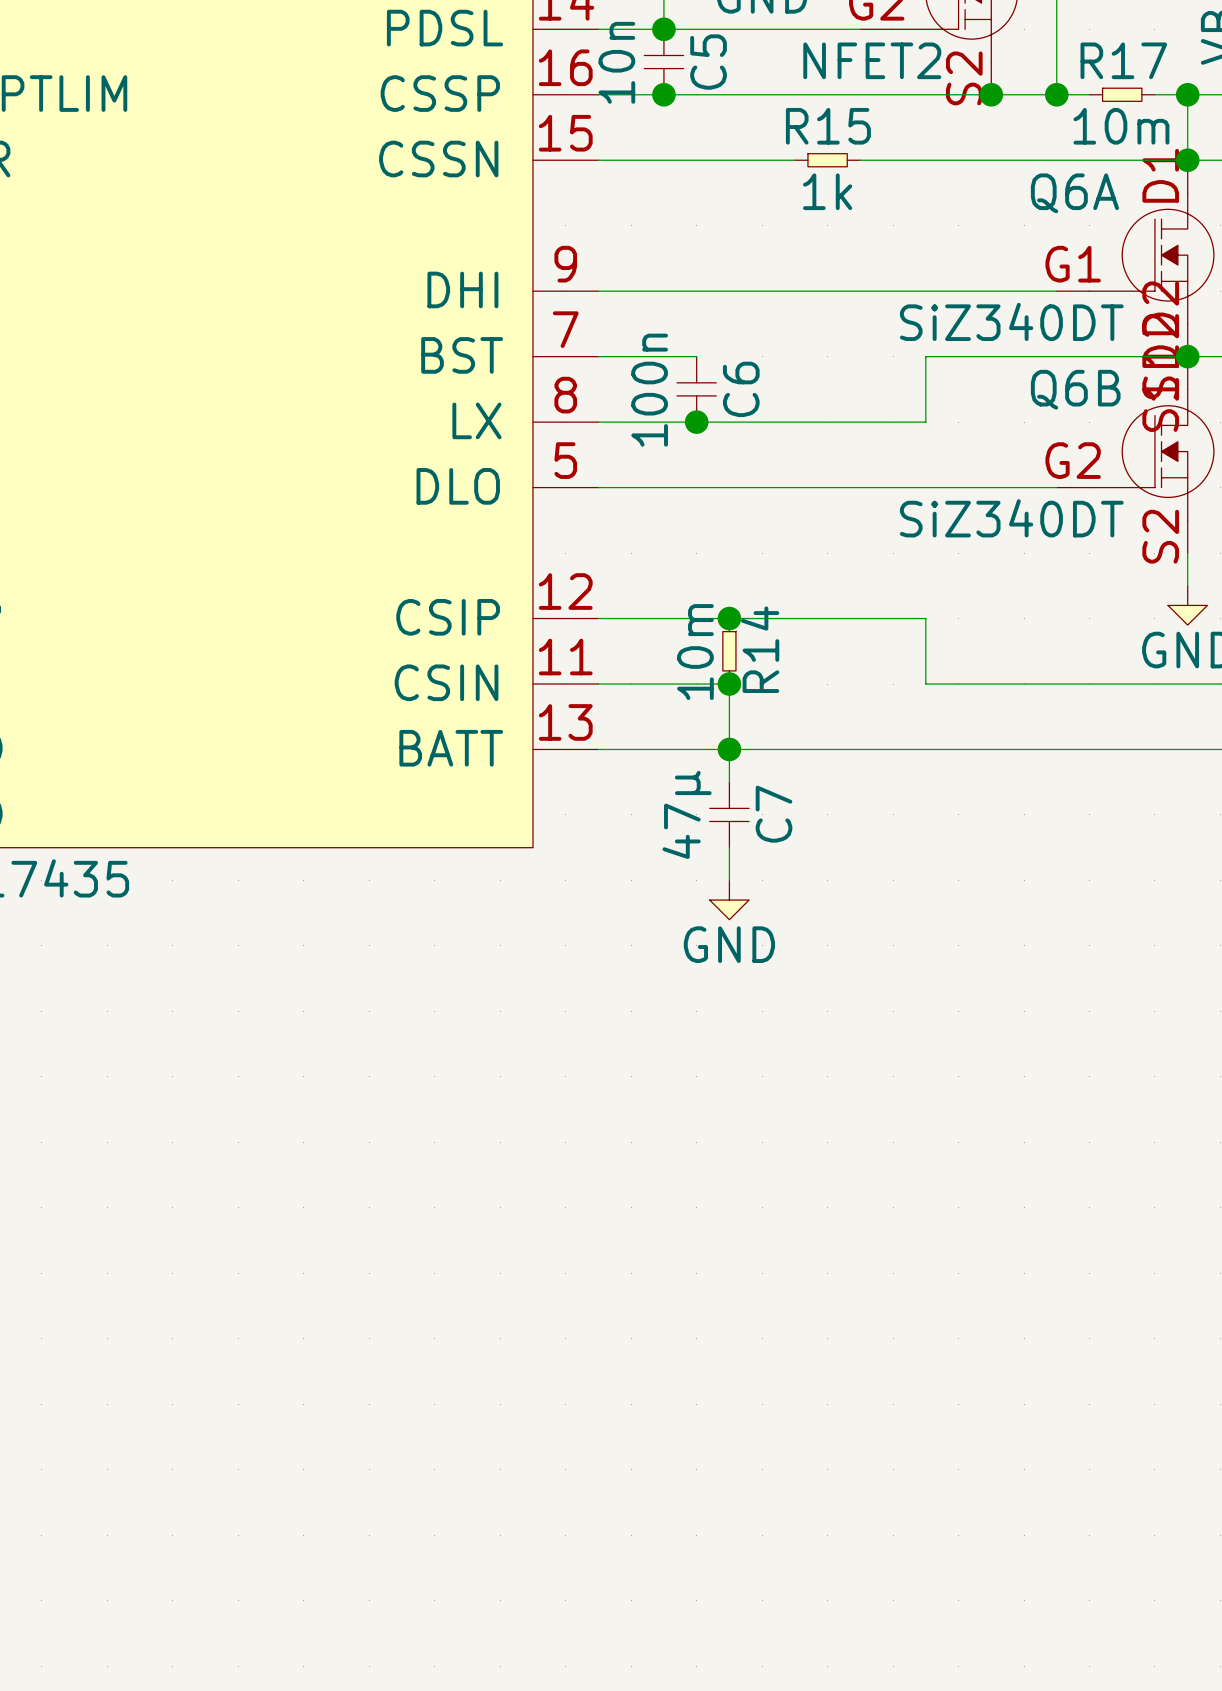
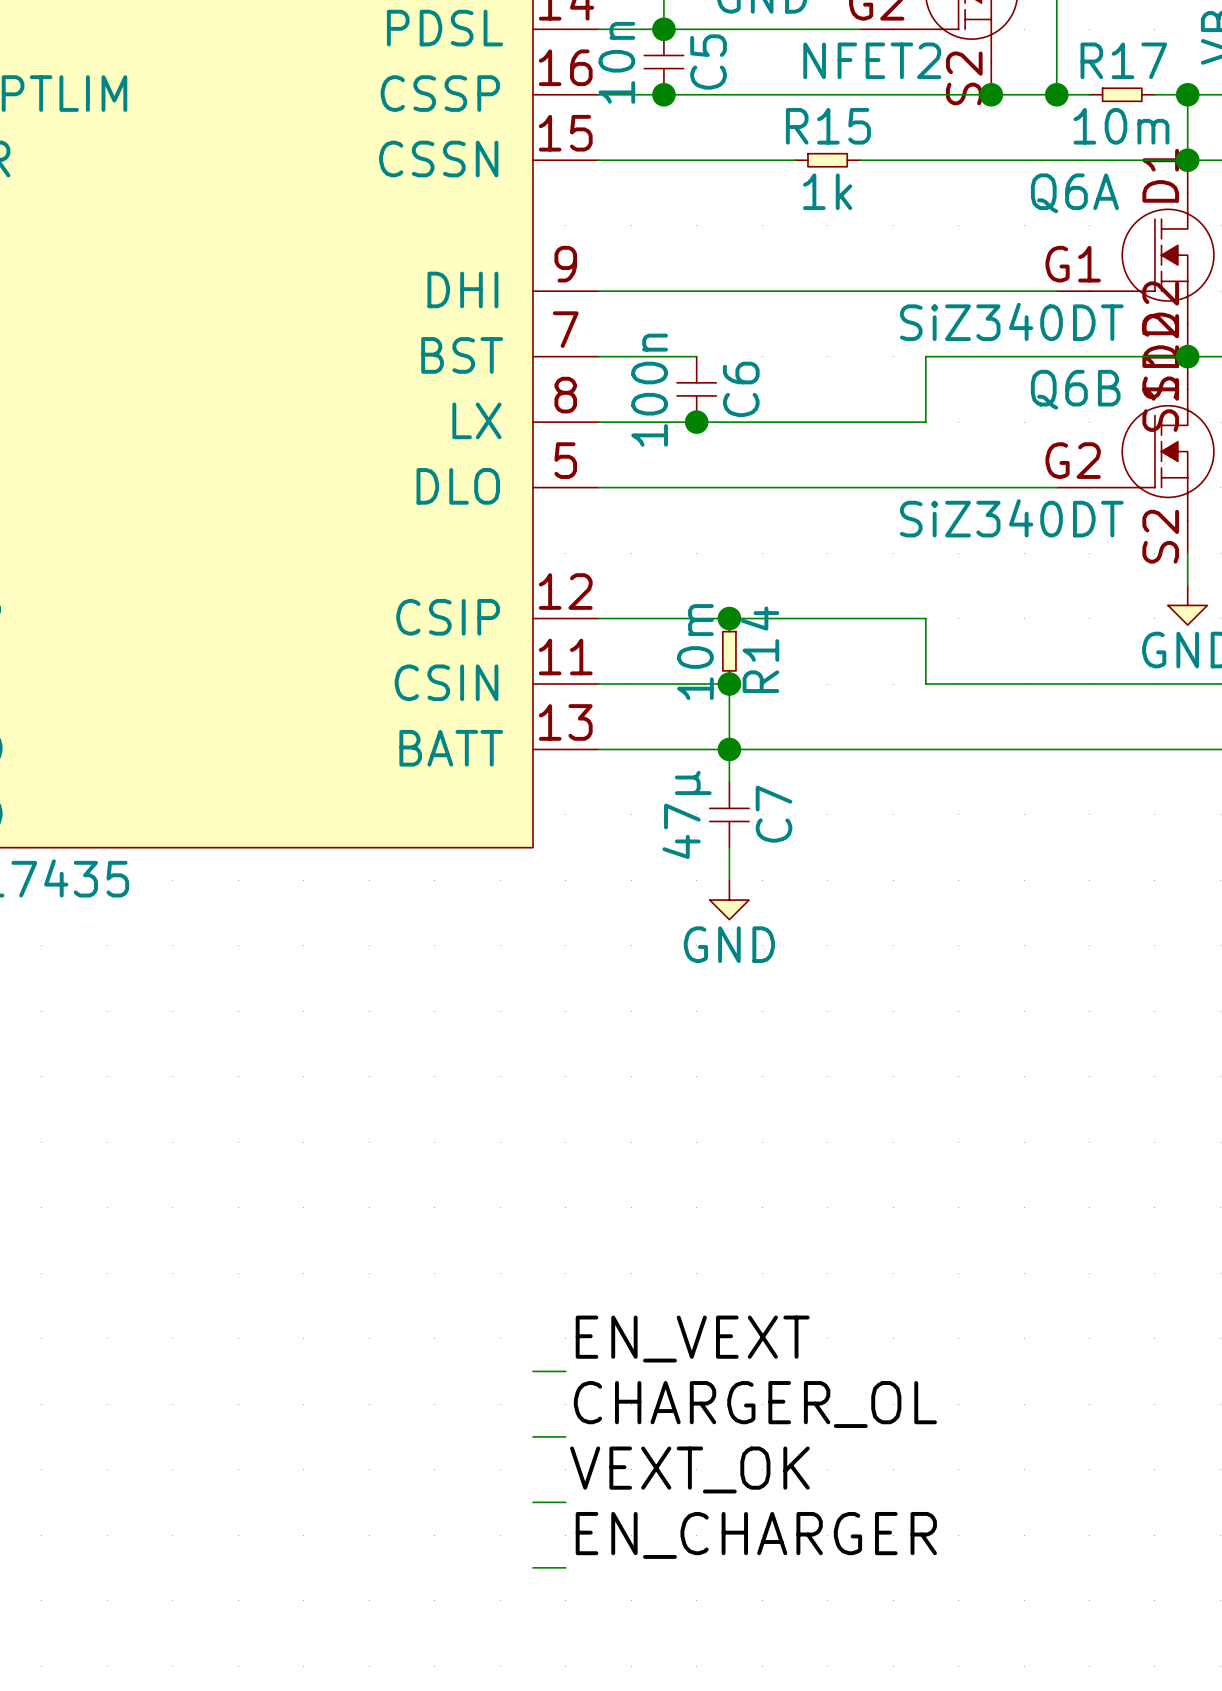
label: none -> EN_VEXT (692, 1339)
wire: none -> (533, 1371) (565, 1371)
label: none -> CHARGER_OL (755, 1404)
wire: none -> (533, 1436) (565, 1436)
label: none -> VEXT_OK (689, 1469)
wire: none -> (533, 1502) (565, 1502)
label: none -> EN_CHARGER (756, 1535)
wire: none -> (533, 1567) (565, 1567)

